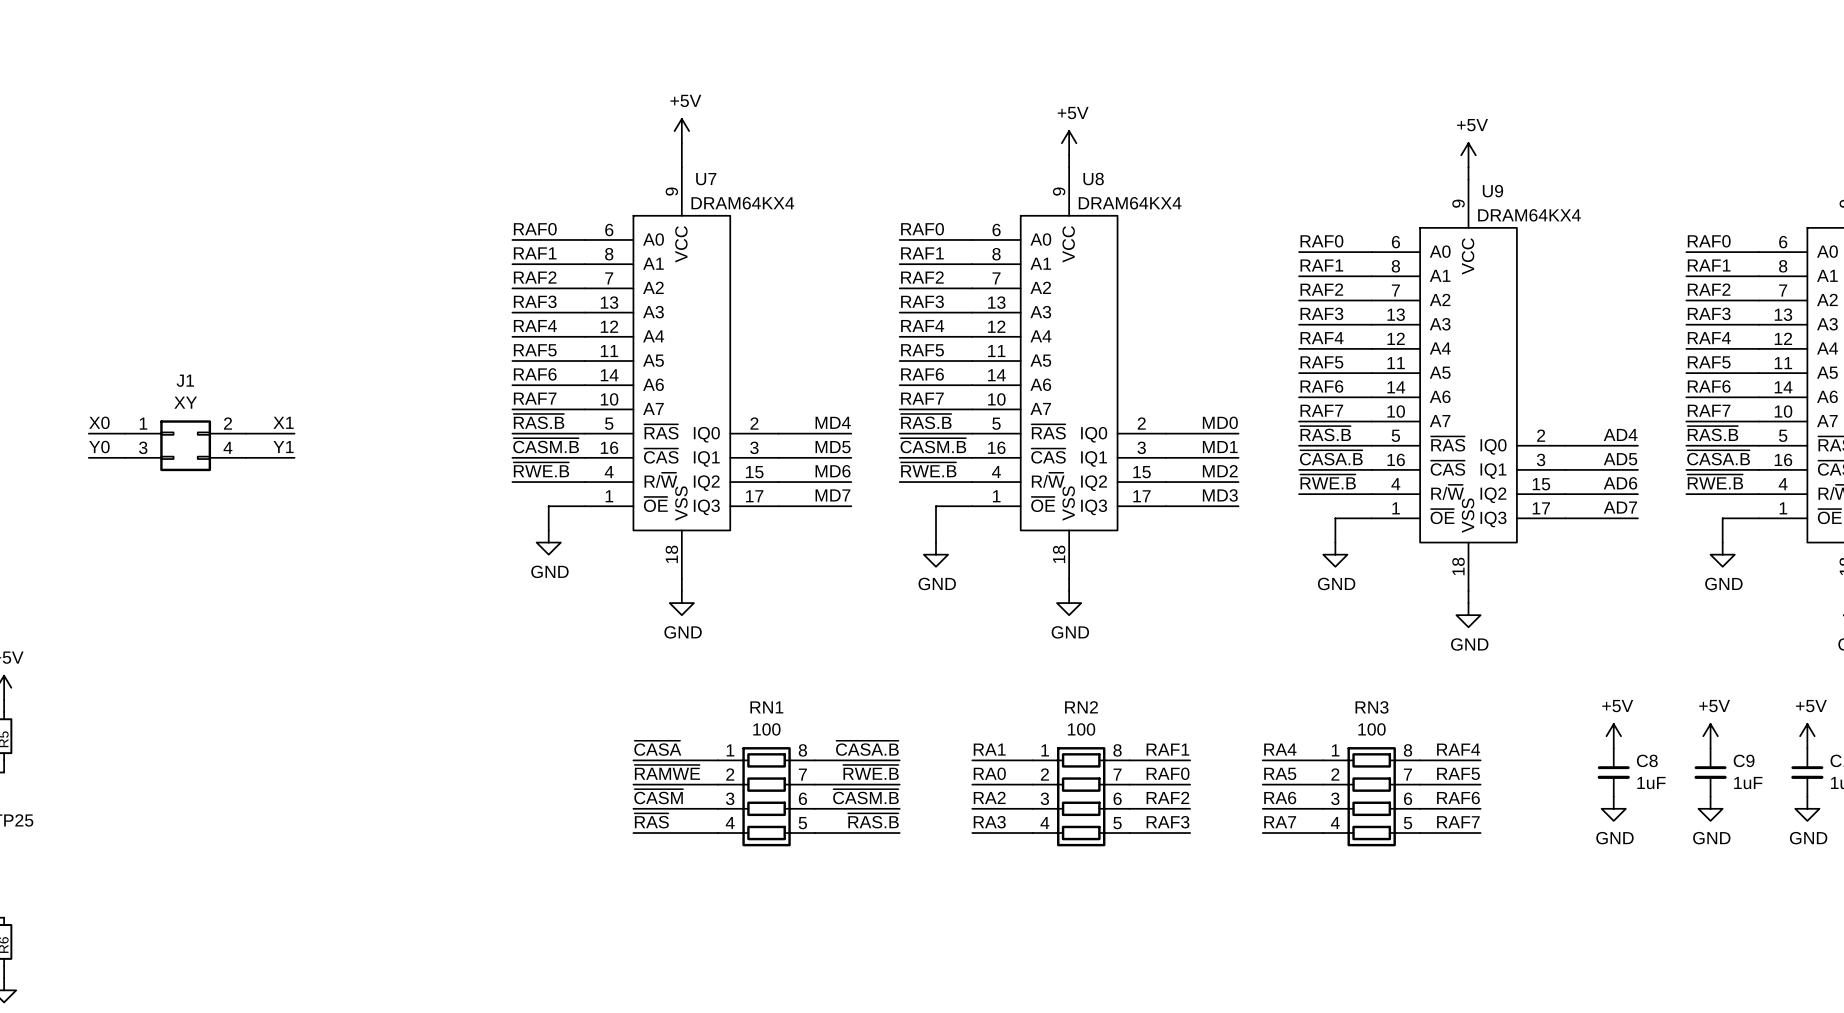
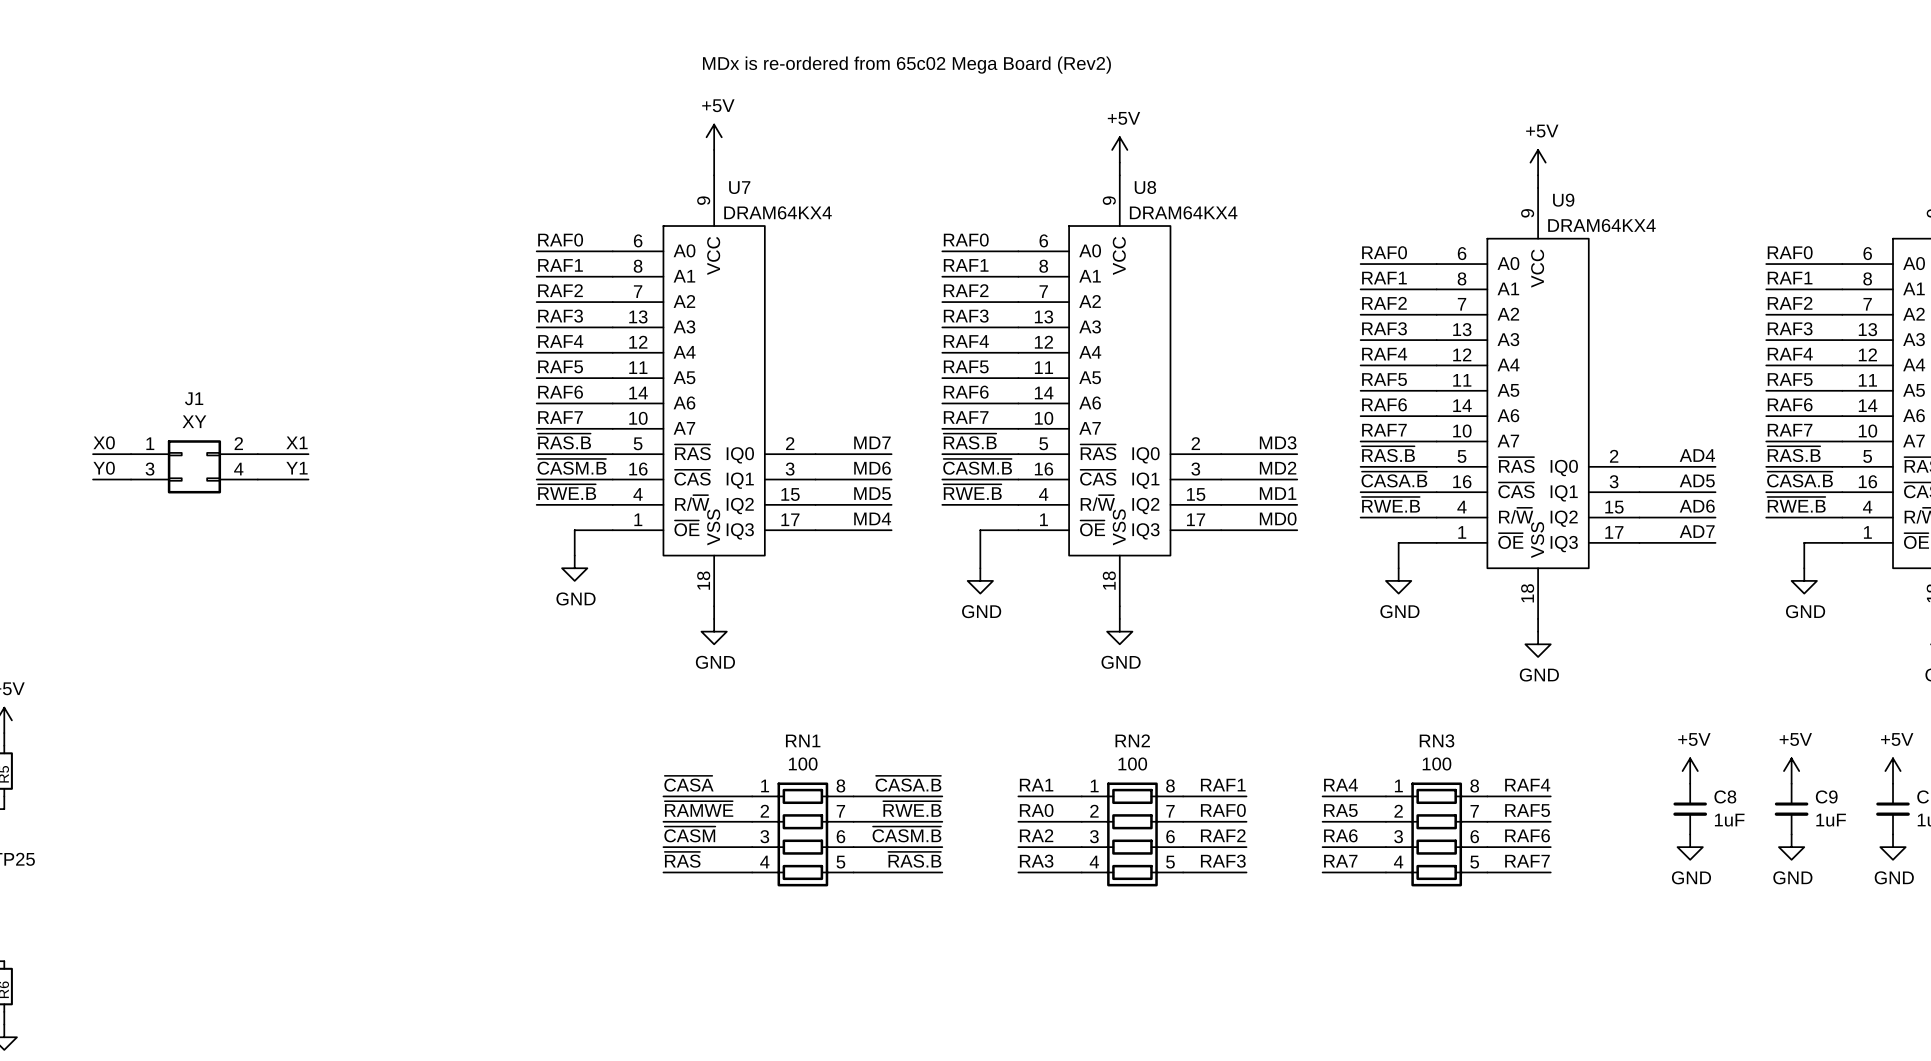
text: none -> MDx is re-ordered from 65c02 Mega Board (Rev2) (906, 65)
label: MD4 (833, 422) -> MD7 (872, 442)
label: MD0 (1220, 422) -> MD3 (1278, 442)
label: MD5 (833, 447) -> MD6 (872, 468)
label: MD1 (1220, 447) -> MD2 (1278, 468)
label: MD6 (833, 471) -> MD5 (872, 493)
label: MD2 (1220, 471) -> MD1 (1278, 493)
label: MD7 (832, 495) -> MD4 (872, 518)
label: MD3 (1220, 495) -> MD0 (1278, 518)

